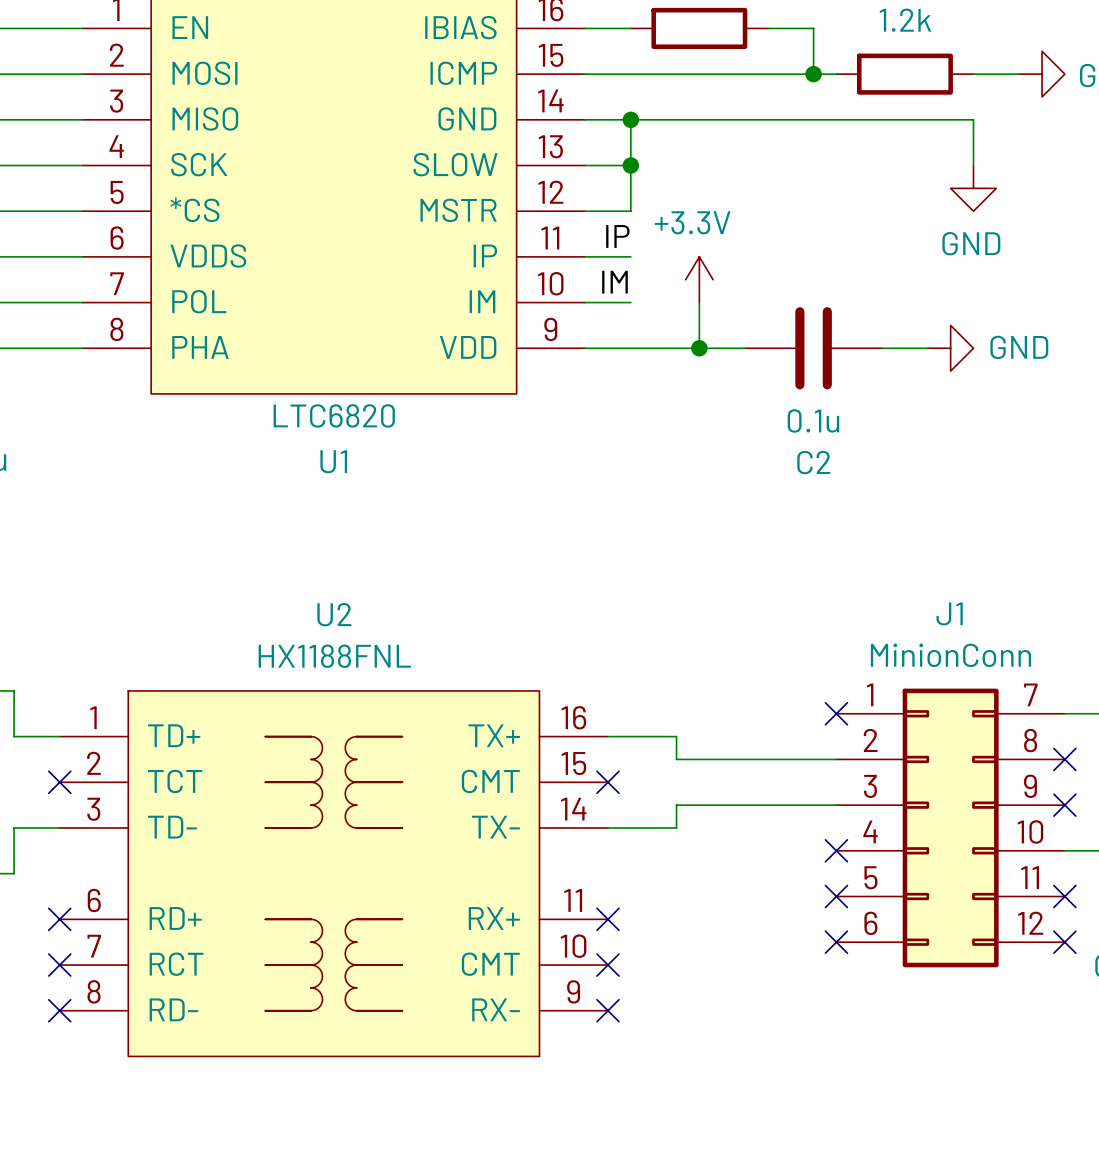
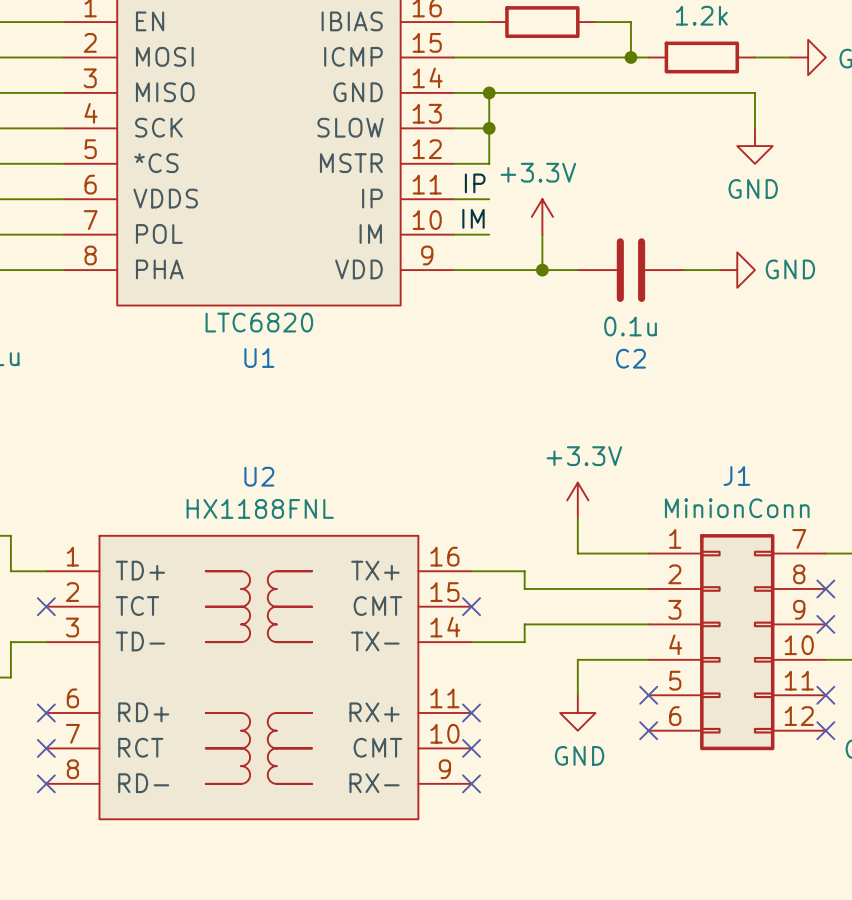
power symbol: none -> +3.3V (577, 500)
wire: none -> (577, 518) (577, 553) (648, 553)
no-connect mark: (836, 713) -> none
wire: none -> (648, 659) (577, 659) (577, 695)
no-connect mark: (836, 850) -> none
power symbol: none -> GND (577, 712)

